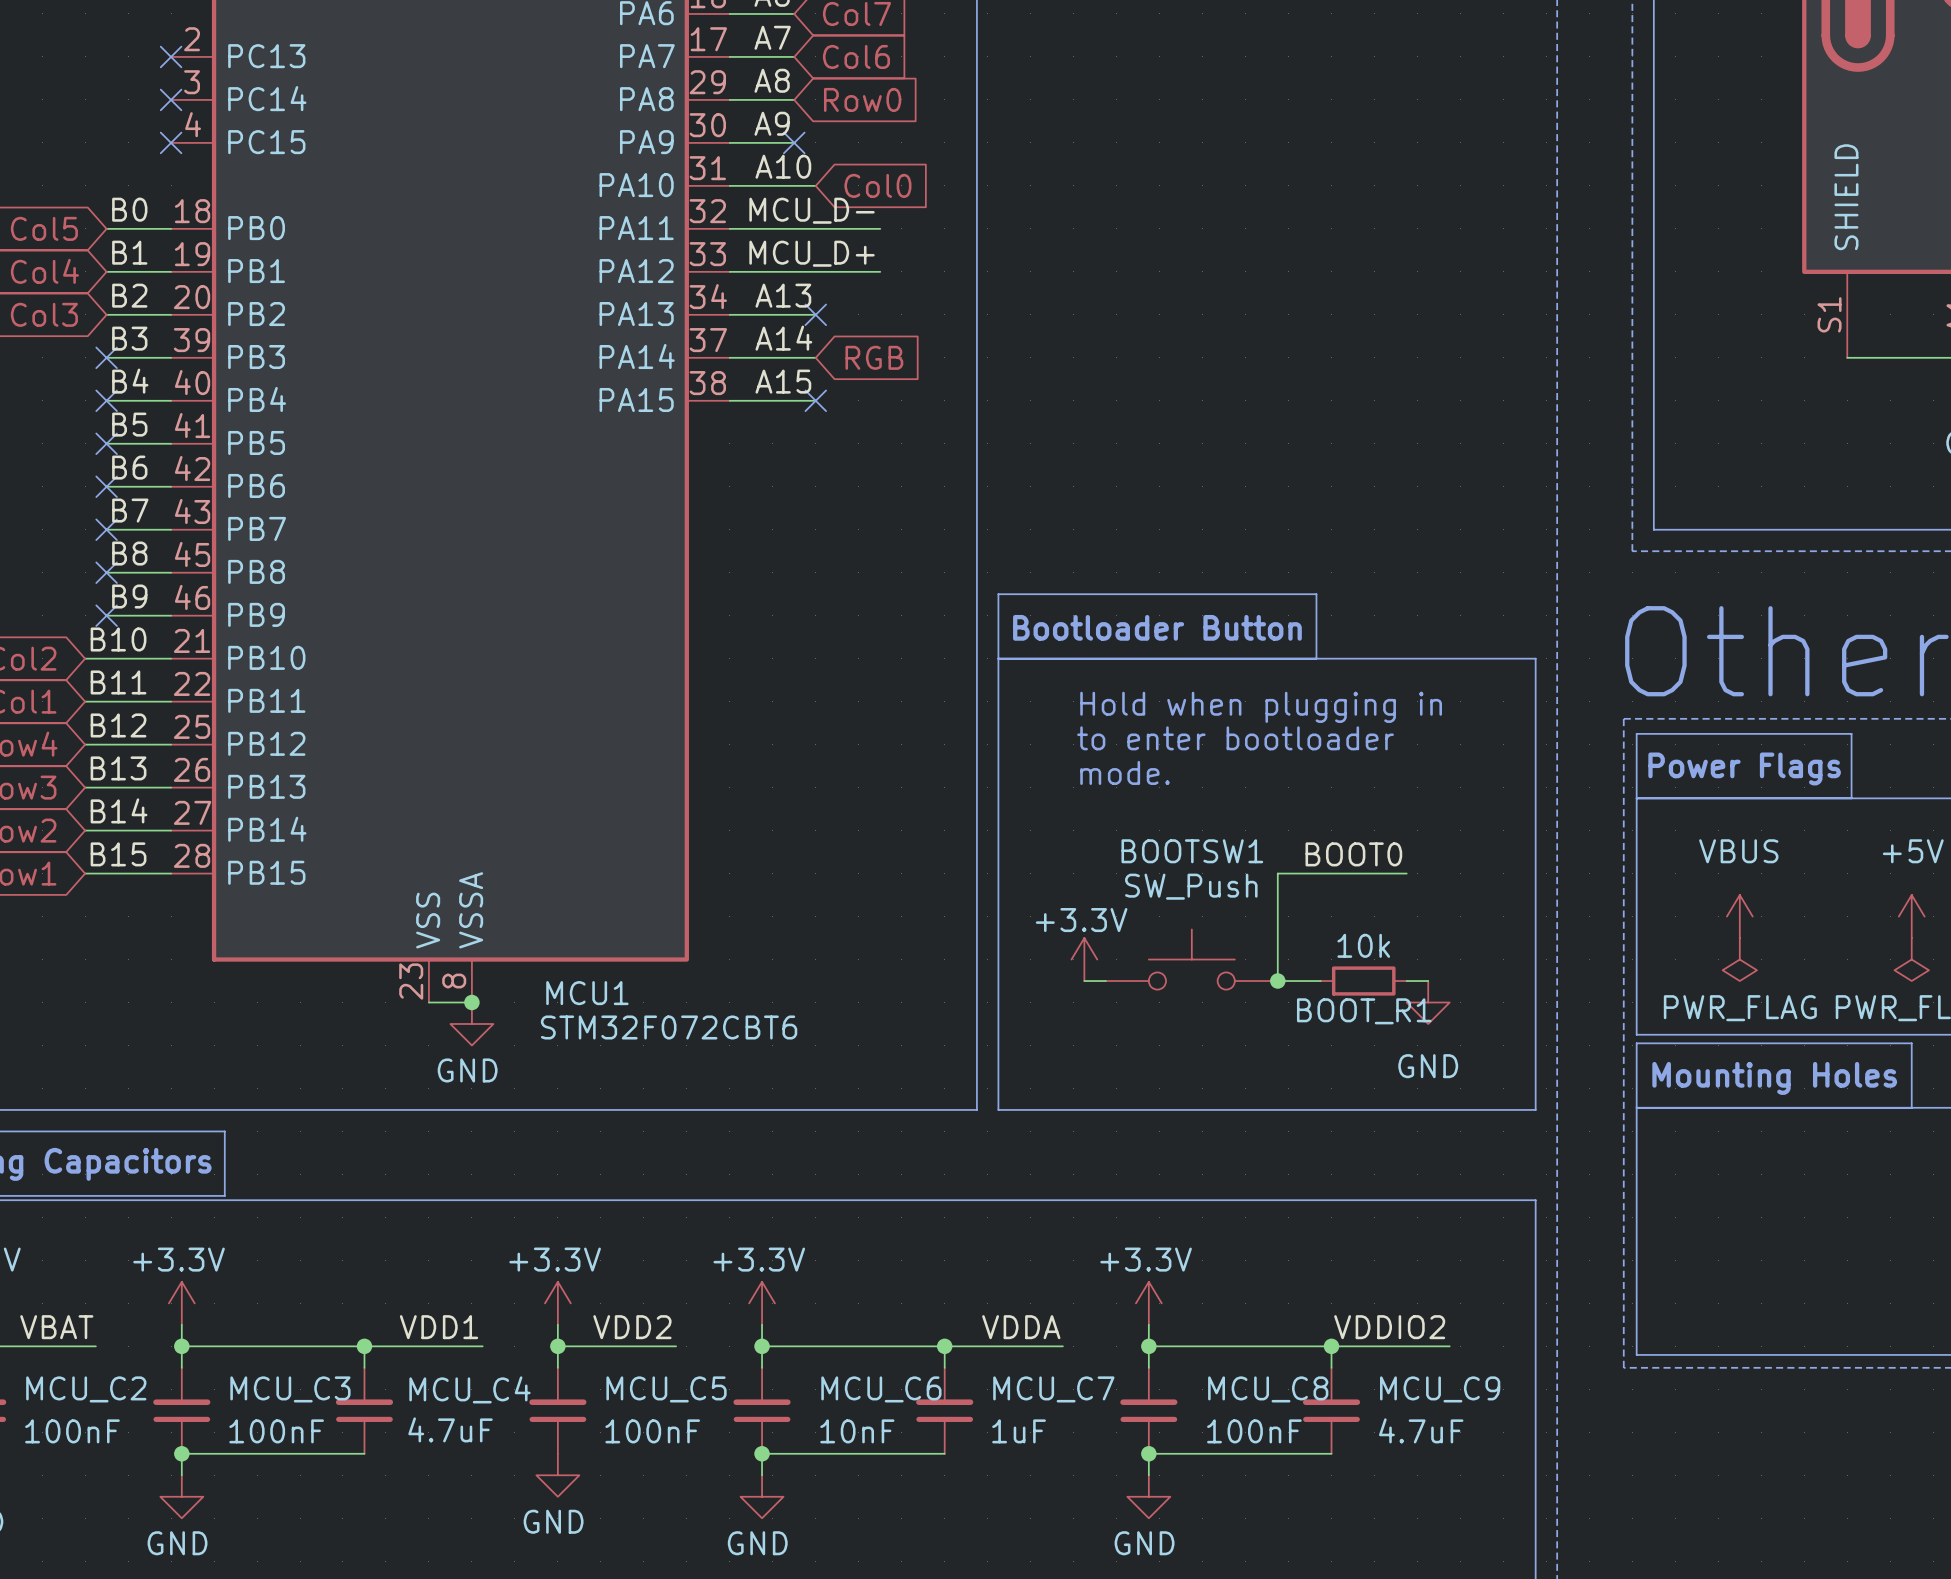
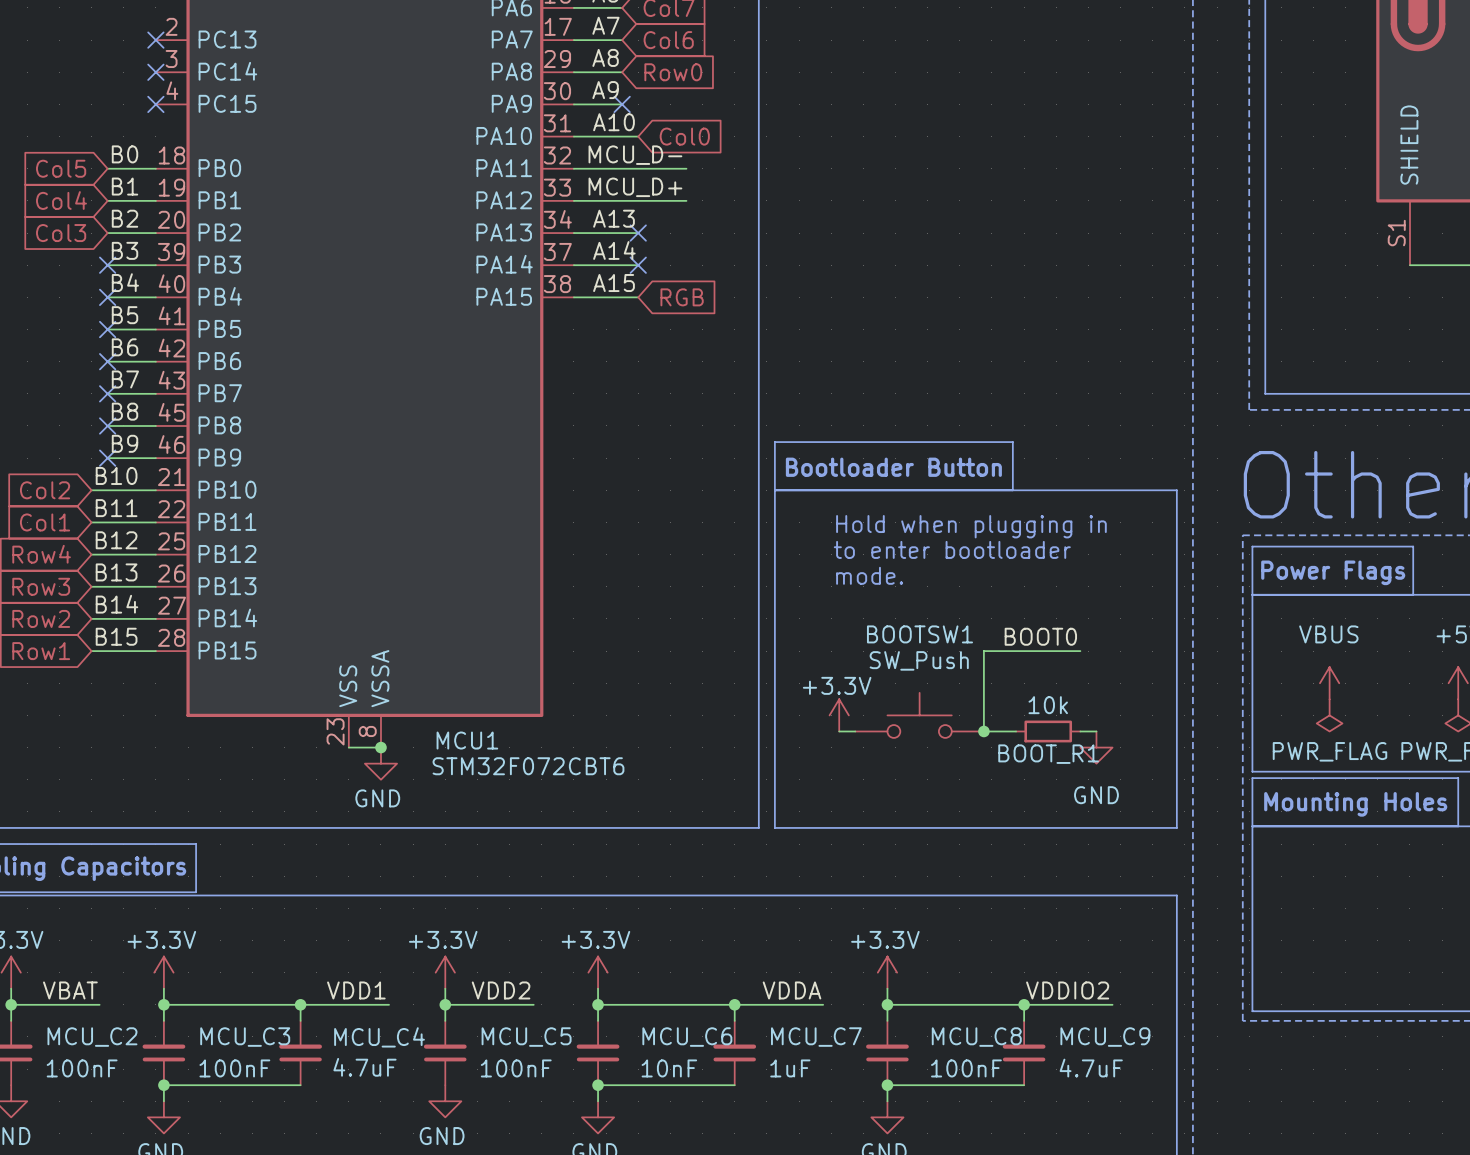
global label position: RGB (874, 357) -> RGB (682, 297)
no-connect mark position: (815, 400) -> (638, 265)

